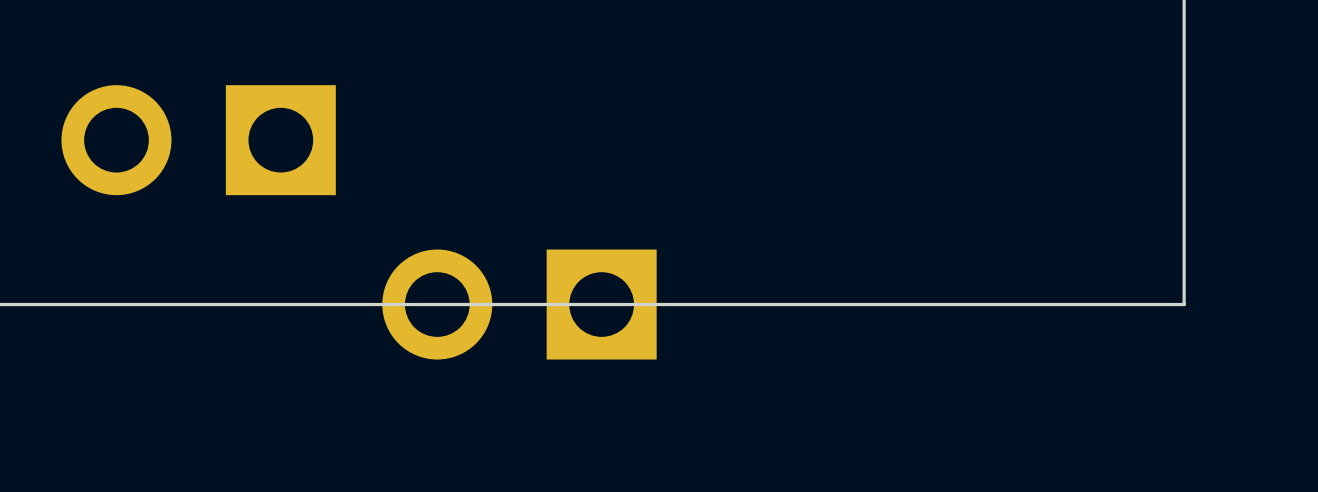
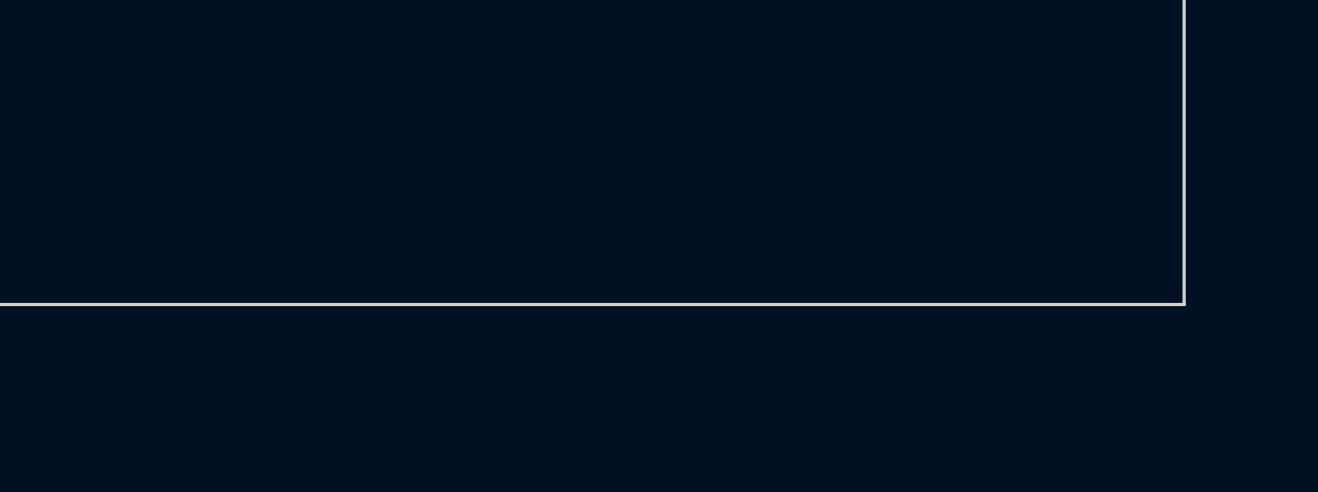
part: (198, 140) -> none
part: (519, 304) -> none

